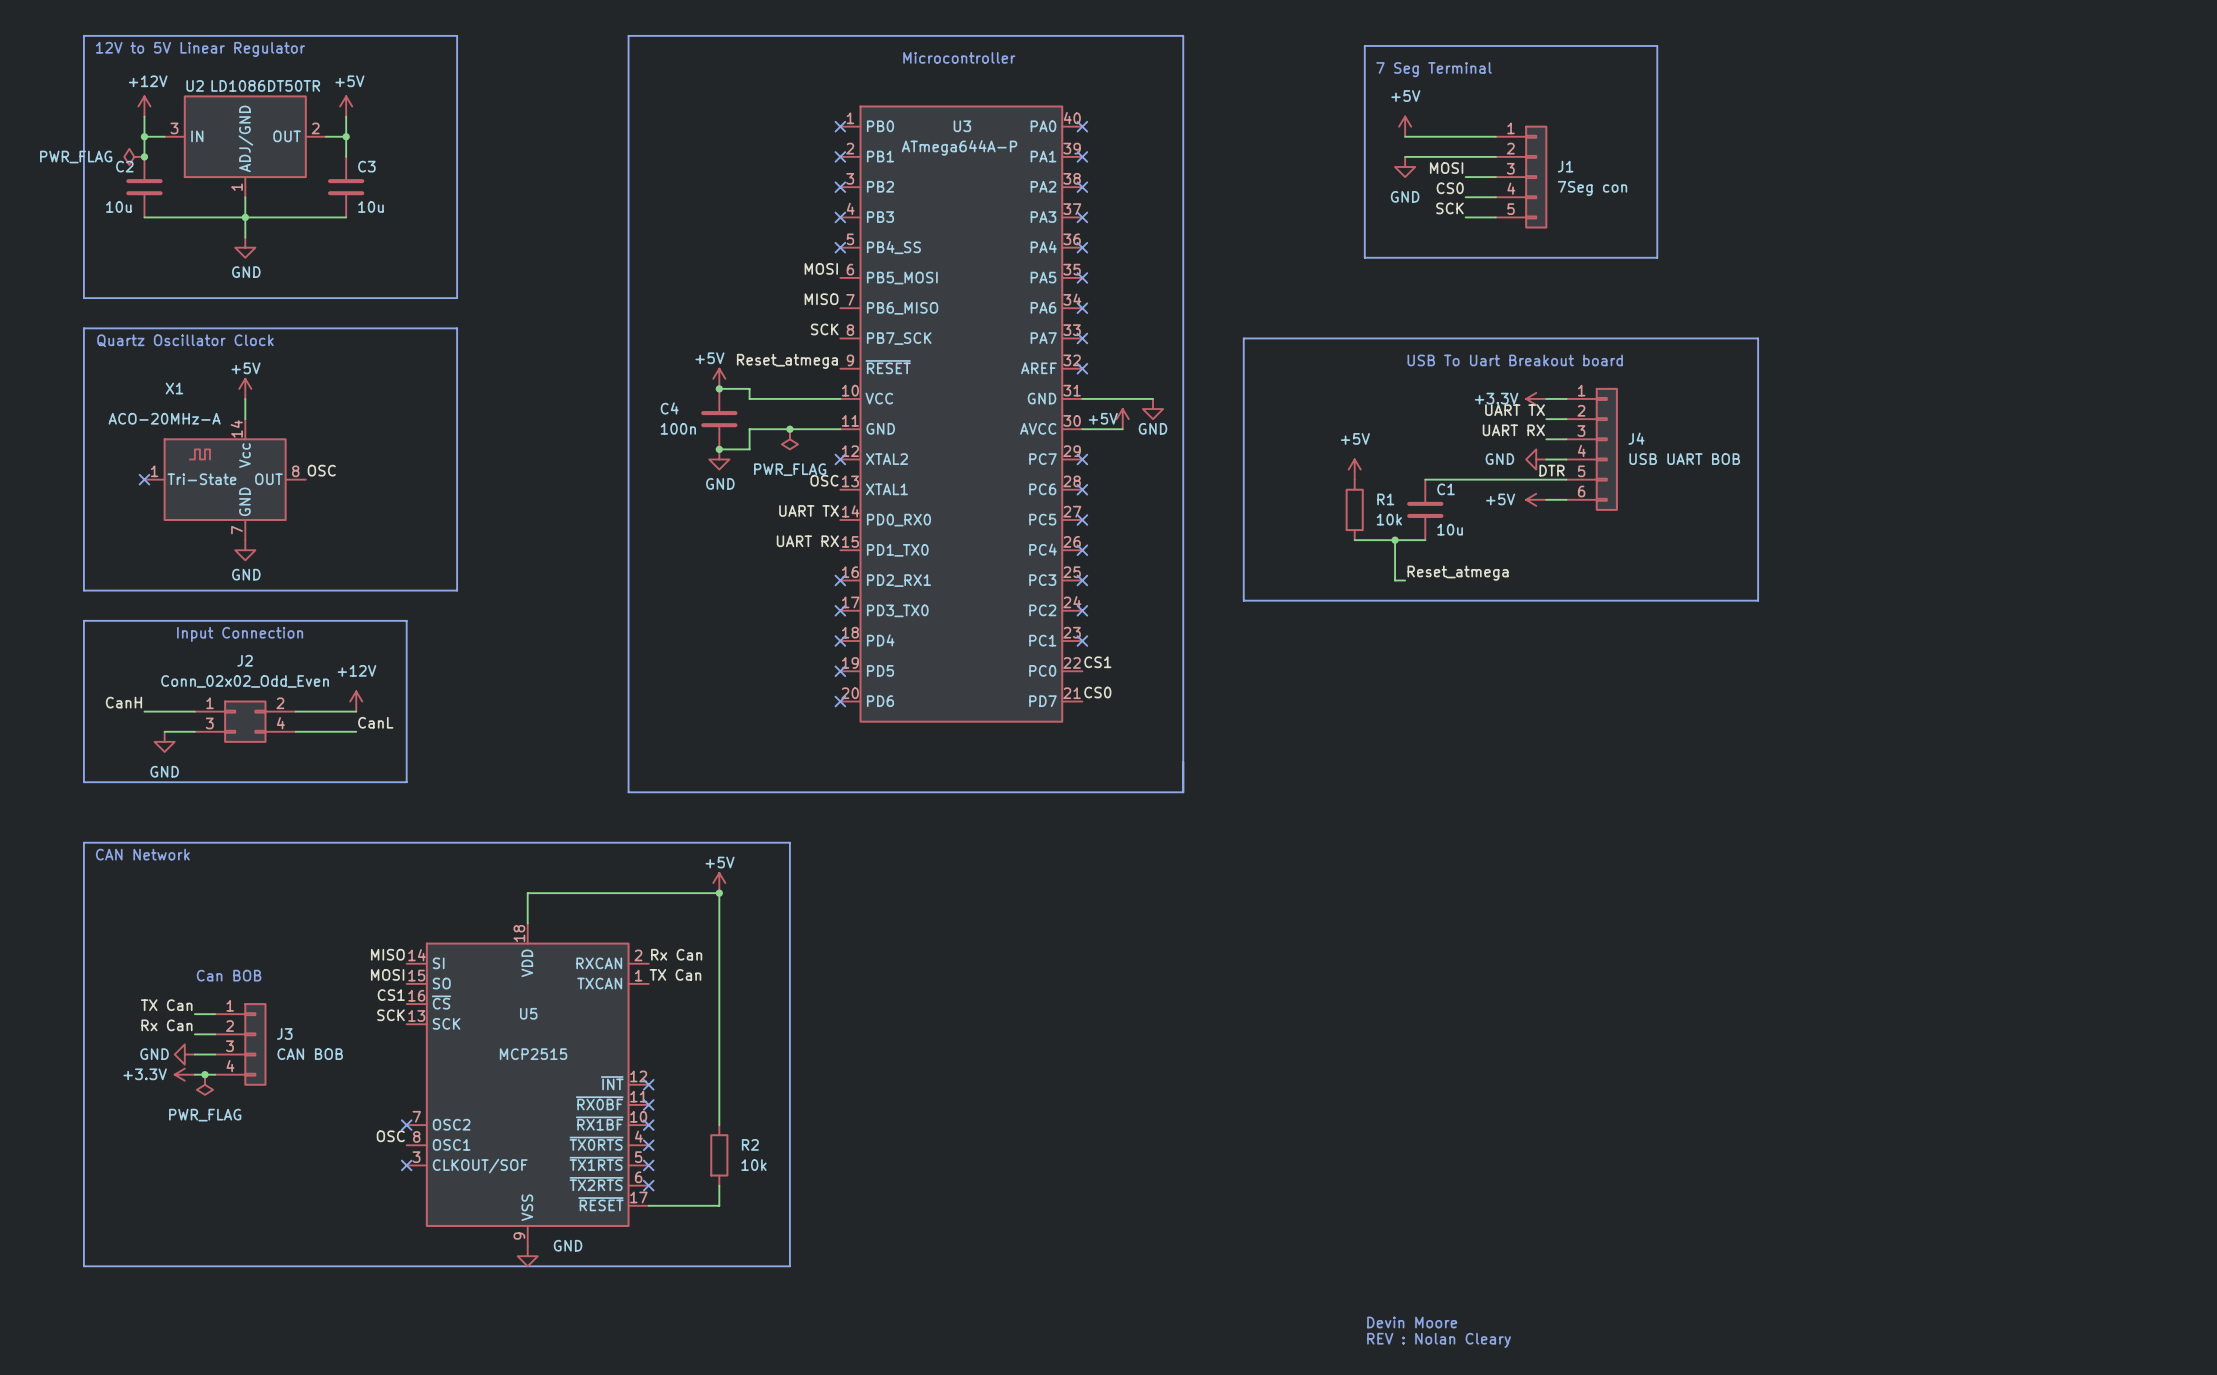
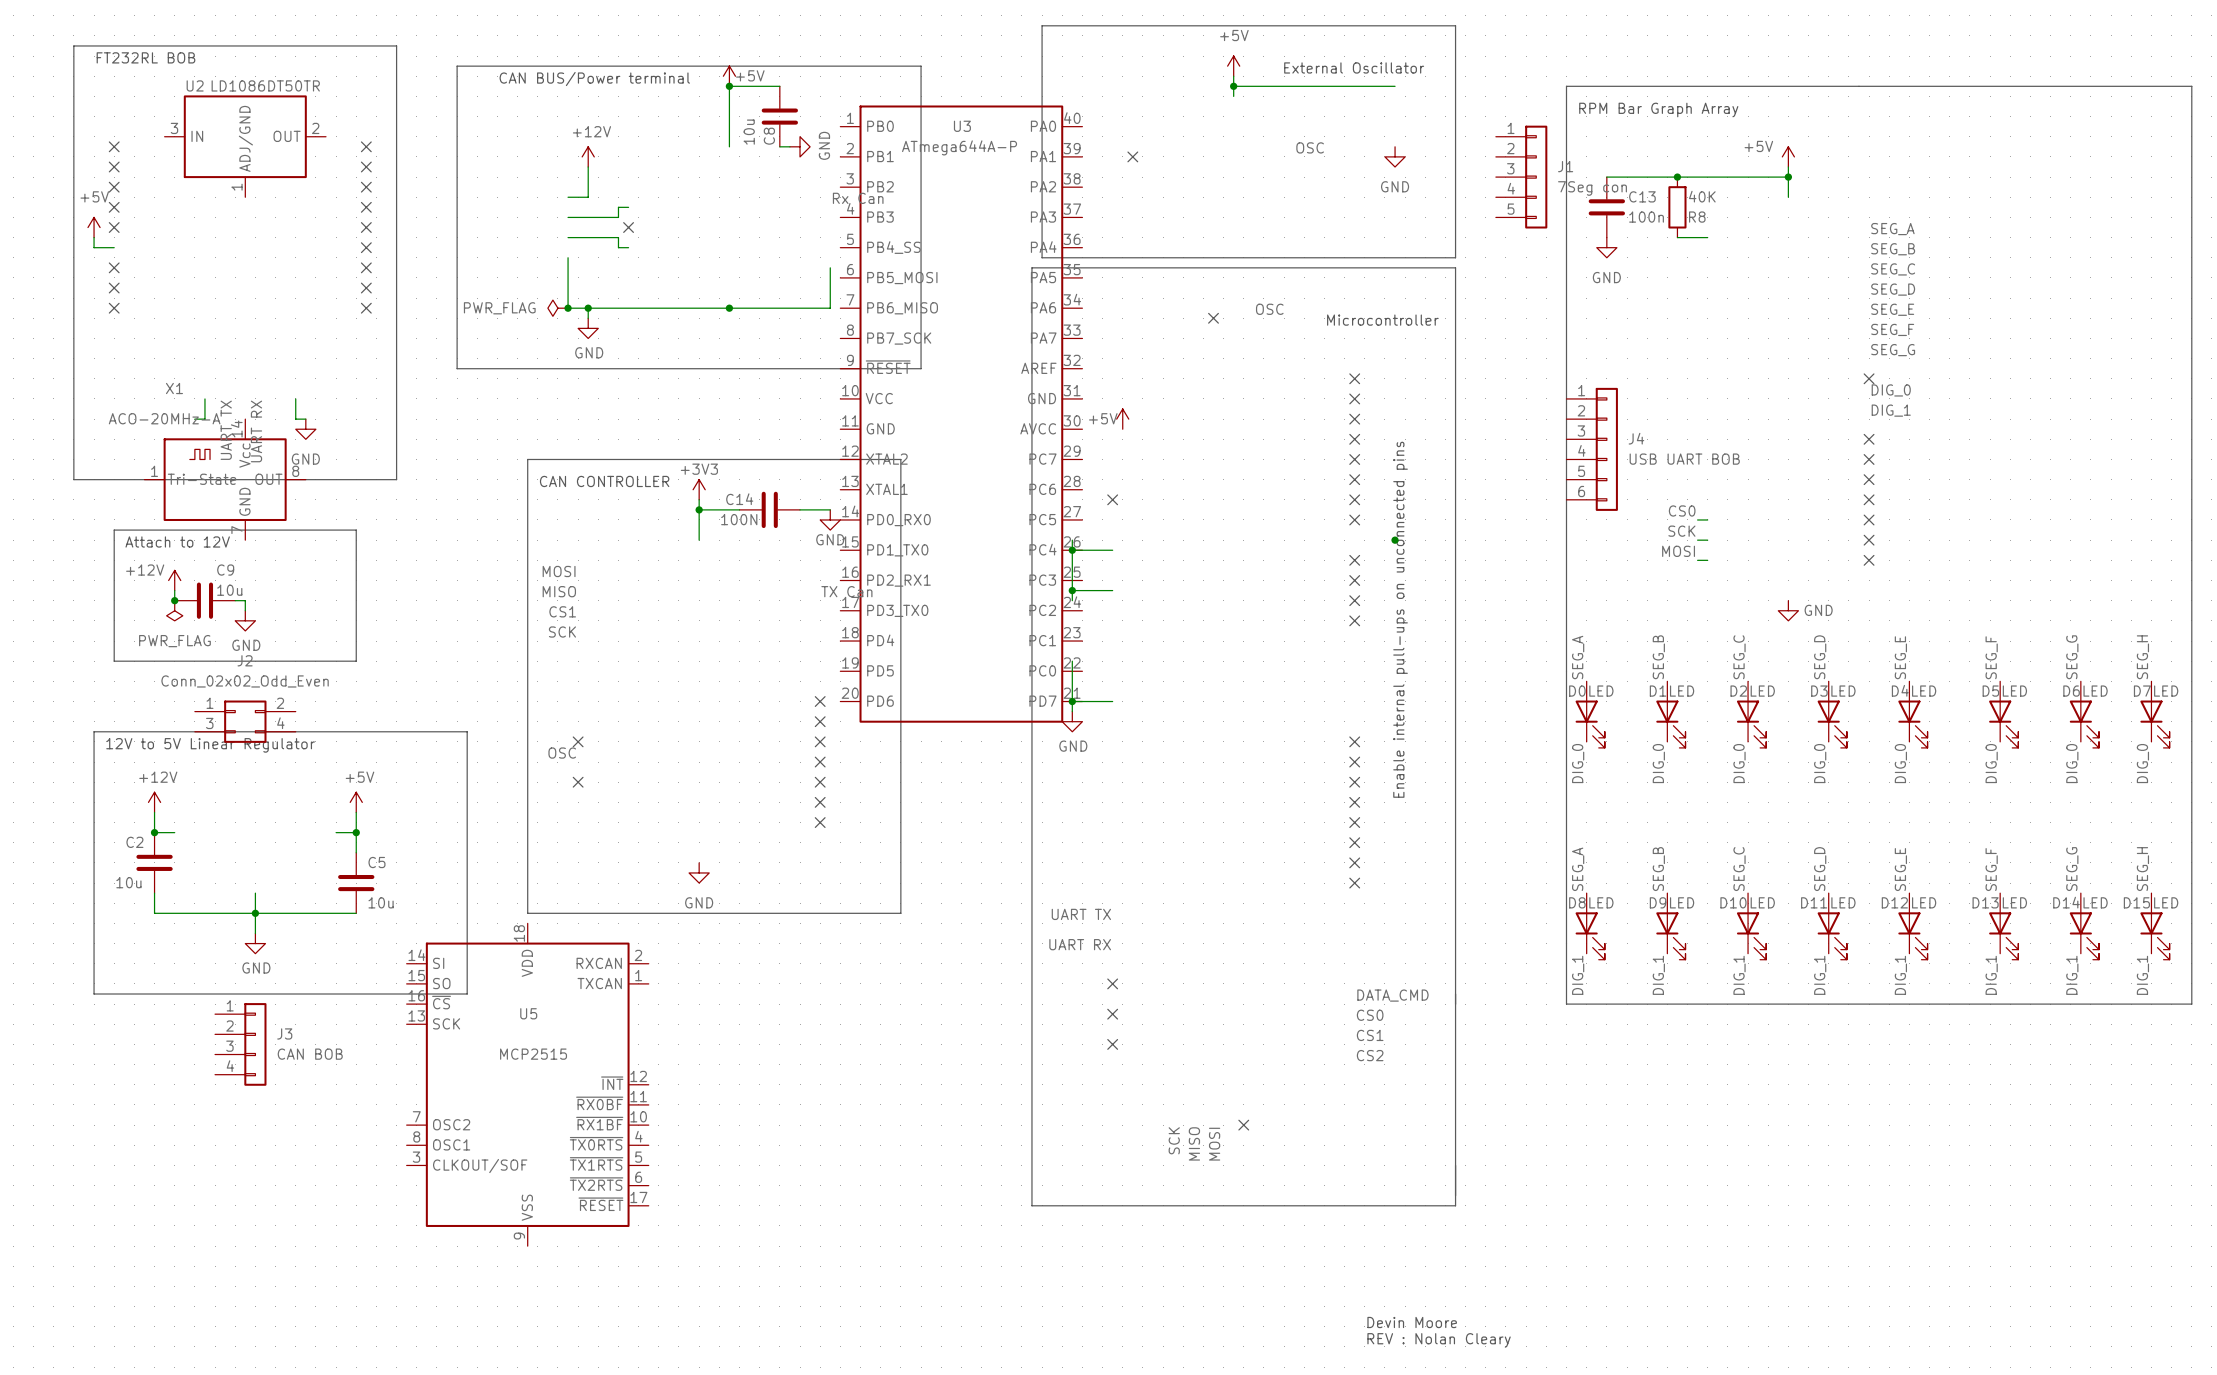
line: (628, 35) (1183, 35) (1183, 792) (628, 792) (628, 35) -> none
line: none -> (73, 45) (396, 45) (396, 479) (73, 479) (73, 45)
text: 12V to 5V Linear Regulator (200, 49) -> none
text: none -> FT232RL BOB (145, 57)
text: Microcontroller (959, 57) -> none
line: (457, 66) (457, 35) (83, 35) (83, 298) (457, 298) -> (457, 66) (921, 66) (921, 368) (457, 368)
text: none -> External Oscillator (1354, 67)
text: 7 Seg Terminal (1434, 69) -> none
power symbol: none -> +5V (729, 76)
wire: none -> (1233, 76) (1233, 96)
text: none -> CAN BUS/Power terminal (594, 79)
junction: none -> (729, 86)
wire: none -> (779, 86) (729, 86) (729, 146)
wire: none -> (1233, 86) (1395, 86)
junction: none -> (1233, 86)
line: none -> (1566, 86) (1566, 1004) (2191, 1004) (2191, 86) (1566, 86)
power symbol: +12V (144, 106) -> none
power symbol: +5V (346, 106) -> none
text: none -> RPM Bar Graph Array (1658, 109)
wire: (144, 116) (144, 156) -> none
wire: (346, 116) (346, 156) -> none
C8: none -> 10u (779, 116)
no-connect mark: (840, 126) -> none
no-connect mark: (1082, 126) -> none
power symbol position: +5V (1405, 126) -> +5V (1233, 66)
wire: (144, 136) (164, 136) -> none
junction: (144, 136) -> none
wire: (325, 136) (346, 136) -> none
junction: (346, 136) -> none
wire: (1405, 136) (1495, 136) -> none
no-connect mark: none -> (114, 146)
no-connect mark: none -> (366, 146)
wire: none -> (779, 146) (789, 146)
power symbol: none -> GND (800, 146)
label: none -> OSC (1310, 147)
power symbol: PWR_FLAG (134, 156) -> none
junction: (144, 156) -> none
power symbol: none -> +12V (588, 156)
no-connect mark: (840, 156) -> none
no-connect mark: (1082, 156) -> none
no-connect mark: none -> (1132, 156)
wire: (1405, 156) (1495, 156) -> none
power symbol: none -> +5V (1788, 156)
no-connect mark: none -> (114, 167)
no-connect mark: none -> (366, 167)
wire: none -> (588, 167) (588, 197) (568, 197)
power symbol position: GND (1405, 167) -> GND (1395, 156)
wire: none -> (1788, 167) (1788, 197)
label: MOSI (1446, 168) -> none
wire: (1465, 177) (1495, 177) -> none
wire: none -> (1606, 177) (1788, 177)
junction: none -> (1677, 177)
junction: none -> (1788, 177)
no-connect mark: none -> (114, 187)
C2 position: (144, 187) -> (154, 862)
C3: 10u (346, 187) -> none
no-connect mark: none -> (366, 187)
no-connect mark: (840, 187) -> none
no-connect mark: (1082, 187) -> none
label: CS0 (1450, 188) -> none
wire: (245, 197) (245, 237) -> none
wire: (1465, 197) (1495, 197) -> none
label: none -> Rx Can (858, 198)
no-connect mark: none -> (114, 207)
no-connect mark: none -> (366, 207)
wire: none -> (628, 207) (618, 207) (618, 217) (568, 217)
C13: none -> 100n (1606, 207)
R8: none -> 40K (1677, 207)
label: SCK (1449, 208) -> none
wire: (144, 217) (346, 217) -> none
junction: (245, 217) -> none
no-connect mark: (840, 217) -> none
no-connect mark: (1082, 217) -> none
wire: (1465, 217) (1495, 217) -> none
power symbol: none -> +5V (94, 227)
no-connect mark: none -> (114, 227)
no-connect mark: none -> (366, 227)
no-connect mark: none -> (628, 227)
label: none -> SEG_A (1892, 229)
wire: none -> (94, 237) (94, 247) (114, 247)
wire: none -> (568, 237) (618, 237) (618, 247) (628, 247)
wire: none -> (1677, 237) (1707, 237)
power symbol: GND (245, 247) -> none
no-connect mark: none -> (366, 247)
no-connect mark: (840, 247) -> none
no-connect mark: (1082, 247) -> none
power symbol: none -> GND (1606, 247)
label: none -> SEG_B (1893, 249)
wire: none -> (568, 257) (568, 308) (830, 308) (830, 267)
line: (1364, 257) (1364, 45) (1657, 45) (1657, 257) (1455, 257) -> (1364, 257) (1042, 257) (1042, 25) (1455, 25) (1455, 257)
no-connect mark: none -> (114, 267)
no-connect mark: none -> (366, 267)
line: none -> (1031, 267) (1455, 267) (1455, 1205) (1031, 1205) (1031, 267)
label: MOSI (821, 268) -> none
label: none -> SEG_C (1893, 269)
no-connect mark: (1082, 277) -> none
no-connect mark: none -> (114, 288)
no-connect mark: none -> (366, 288)
label: none -> SEG_D (1893, 289)
label: MISO (821, 299) -> none
no-connect mark: none -> (114, 308)
no-connect mark: none -> (366, 308)
power symbol: none -> PWR_FLAG (557, 308)
junction: none -> (568, 308)
wire: none -> (588, 308) (588, 318)
junction: none -> (588, 308)
junction: none -> (729, 308)
no-connect mark: (1082, 308) -> none
label: none -> OSC (1269, 309)
label: none -> SEG_E (1892, 309)
no-connect mark: none -> (1213, 318)
text: none -> Microcontroller (1382, 320)
line: (457, 328) (83, 328) (83, 590) (457, 590) (457, 368) -> (457, 328) (457, 298)
power symbol: none -> GND (588, 328)
label: SCK (824, 329) -> none
label: none -> SEG_F (1892, 329)
no-connect mark: (1082, 338) -> none
line: (1243, 338) (1758, 338) (1758, 600) (1243, 600) (1243, 338) -> none
text: Quartz Oscillator Clock (185, 340) -> none
label: none -> SEG_G (1893, 350)
text: USB To Uart Breakout board (1515, 360) -> none
label: Reset_atmega (787, 361) -> none
no-connect mark: (1082, 368) -> none
power symbol: +5V (719, 378) -> none
no-connect mark: none -> (1354, 378)
no-connect mark: none -> (1869, 378)
power symbol: +5V (245, 388) -> none
wire: (719, 388) (749, 388) (749, 398) (840, 398) -> none
junction: (719, 388) -> none
label: none -> DIG_0 (1891, 390)
wire: none -> (204, 398) (204, 419) (194, 419)
wire: (245, 398) (245, 419) -> none
wire: none -> (295, 398) (295, 419) (305, 419)
wire: (1082, 398) (1153, 398) -> none
no-connect mark: none -> (1354, 398)
power symbol: +3.3V (1536, 398) -> none
wire: (1546, 398) (1566, 398) -> none
power symbol: GND (1153, 409) -> none
label: UART TX (1515, 410) -> none
label: none -> DIG_1 (1891, 410)
C4: 100n (719, 419) -> none
no-connect mark: none -> (1354, 419)
wire: (1546, 419) (1566, 419) -> none
power symbol: none -> GND (305, 429)
junction: (789, 429) -> none
wire: (840, 429) (749, 429) (749, 449) (719, 449) -> none
wire: (1082, 429) (1122, 429) -> (1072, 550) (1112, 550)
label: none -> UART TX (226, 430)
label: UART RX (1513, 430) -> none
label: none -> UART RX (256, 431)
power symbol: PWR_FLAG (789, 439) -> none
no-connect mark: none -> (1354, 439)
wire: (1546, 439) (1566, 439) -> none
no-connect mark: none -> (1869, 439)
junction: (719, 449) -> none
line: none -> (527, 459) (900, 459) (900, 913) (527, 913) (527, 459)
power symbol: GND (719, 459) -> none
no-connect mark: (840, 459) -> none
no-connect mark: (1082, 459) -> none
no-connect mark: none -> (1354, 459)
power symbol: GND (1536, 459) -> none
wire: (1546, 459) (1566, 459) -> none
no-connect mark: none -> (1869, 459)
power symbol: +5V (1354, 469) -> none
label: OSC (321, 470) -> none
label: DTR (1552, 470) -> none
no-connect mark: (144, 479) -> none
no-connect mark: none -> (1354, 479)
wire: (1425, 479) (1566, 479) -> none
no-connect mark: none -> (1869, 479)
label: OSC (824, 480) -> none
text: none -> CAN CONTROLLER (604, 481)
power symbol: none -> +3V3 (699, 489)
no-connect mark: (1082, 489) -> none
wire: none -> (699, 499) (699, 540)
no-connect mark: none -> (1112, 499)
no-connect mark: none -> (1354, 499)
power symbol: +5V (1536, 499) -> none
wire: (1546, 499) (1566, 499) -> none
no-connect mark: none -> (1869, 499)
wire: none -> (699, 509) (739, 509)
junction: none -> (699, 509)
C14: none -> 100N (769, 509)
wire: none -> (800, 509) (830, 509)
R1: 10k (1354, 509) -> none
C1: 10u (1425, 509) -> none
label: UART TX (809, 510) -> none
label: none -> CS0 (1682, 510)
power symbol: none -> GND (830, 519)
no-connect mark: (1082, 519) -> none
no-connect mark: none -> (1354, 519)
wire: none -> (1697, 519) (1707, 519)
no-connect mark: none -> (1869, 519)
line: none -> (114, 530) (114, 661) (356, 661) (356, 530) (114, 530)
label: none -> SCK (1681, 531)
wire: none -> (1072, 540) (1072, 600)
wire: (1354, 540) (1425, 540) -> none
wire: (1395, 540) (1395, 580) (1405, 580) -> none
wire: none -> (1697, 540) (1707, 540)
no-connect mark: none -> (1869, 540)
text: none -> Attach to 12V (177, 541)
label: UART RX (807, 541) -> none
power symbol: GND (245, 550) -> none
junction: none -> (1072, 550)
no-connect mark: (1082, 550) -> none
label: none -> MOSI (1678, 551)
no-connect mark: none -> (1354, 560)
wire: none -> (1697, 560) (1707, 560)
no-connect mark: none -> (1869, 560)
label: none -> MOSI (559, 571)
label: Reset_atmega (1458, 573) -> none
power symbol: none -> +12V (174, 580)
no-connect mark: (840, 580) -> none
no-connect mark: (1082, 580) -> none
no-connect mark: none -> (1354, 580)
wire: none -> (174, 590) (174, 600)
wire: none -> (1072, 590) (1112, 590)
junction: none -> (1072, 590)
label: none -> MISO (559, 591)
label: none -> TX Can (846, 591)
junction: none -> (174, 600)
C9: none -> 10u (204, 600)
wire: none -> (235, 600) (245, 600) (245, 610)
no-connect mark: none -> (1354, 600)
power symbol: none -> PWR_FLAG (174, 610)
no-connect mark: (840, 610) -> none
no-connect mark: (1082, 610) -> none
power symbol: none -> GND (1788, 610)
label: none -> CS1 (562, 611)
text: none -> Enable internal pull-ups on unconnected pins (1400, 619)
line: (83, 620) (406, 620) (406, 782) (83, 782) (83, 620) -> none
power symbol: none -> GND (245, 620)
no-connect mark: none -> (1354, 620)
label: none -> SCK (562, 632)
text: Input Connection (240, 634) -> none
no-connect mark: (840, 641) -> none
no-connect mark: (1082, 641) -> none
label: none -> SEG_A (1578, 657)
label: none -> SEG_B (1658, 657)
label: none -> SEG_C (1739, 657)
label: none -> SEG_D (1820, 657)
label: none -> SEG_E (1900, 657)
label: none -> SEG_F (1991, 657)
label: none -> SEG_G (2072, 657)
label: none -> SEG_H (2142, 657)
wire: none -> (1072, 661) (1072, 711)
label: CS1 (1097, 662) -> none
no-connect mark: (840, 671) -> none
label: CS0 (1097, 692) -> none
power symbol: +12V (356, 701) -> none
no-connect mark: none -> (820, 701)
no-connect mark: (840, 701) -> none
wire: none -> (1072, 701) (1112, 701)
junction: none -> (1072, 701)
label: CanH (123, 702) -> none
wire: (144, 711) (194, 711) -> none
wire: (295, 711) (356, 711) -> none
D0: none -> LED (1590, 714)
D1: none -> LED (1670, 714)
D2: none -> LED (1751, 714)
D3: none -> LED (1832, 714)
D4: none -> LED (1912, 714)
D5: none -> LED (2003, 714)
D6: none -> LED (2084, 714)
D7: none -> LED (2154, 714)
no-connect mark: none -> (820, 721)
power symbol: none -> GND (1072, 721)
label: CanL (375, 722) -> none
line: none -> (94, 731) (94, 994) (467, 994) (467, 731) (94, 731)
power symbol: GND (164, 741) -> none
no-connect mark: none -> (578, 741)
no-connect mark: none -> (820, 741)
no-connect mark: none -> (1354, 741)
text: none -> 12V to 5V Linear Regulator (210, 745)
label: none -> OSC (562, 753)
no-connect mark: none -> (820, 762)
no-connect mark: none -> (1354, 762)
label: none -> DIG_0 (1578, 763)
label: none -> DIG_0 (1658, 763)
label: none -> DIG_0 (1739, 763)
label: none -> DIG_0 (1820, 763)
label: none -> DIG_0 (1900, 763)
label: none -> DIG_0 (1991, 763)
label: none -> DIG_0 (2072, 763)
label: none -> DIG_0 (2142, 763)
no-connect mark: none -> (578, 782)
no-connect mark: none -> (820, 782)
no-connect mark: none -> (1354, 782)
power symbol: none -> +12V (154, 802)
power symbol: none -> +5V (356, 802)
no-connect mark: none -> (820, 802)
no-connect mark: none -> (1354, 802)
wire: none -> (154, 812) (154, 832) (174, 832)
wire: none -> (356, 812) (356, 852)
no-connect mark: none -> (820, 822)
no-connect mark: none -> (1354, 822)
junction: none -> (154, 832)
wire: none -> (336, 832) (356, 832)
junction: none -> (356, 832)
line: (83, 842) (83, 1266) (789, 1266) (789, 842) (83, 842) -> none
no-connect mark: none -> (1354, 842)
text: CAN Network (142, 854) -> none
no-connect mark: none -> (1354, 862)
label: none -> SEG_A (1578, 869)
label: none -> SEG_B (1658, 869)
label: none -> SEG_C (1739, 869)
label: none -> SEG_D (1820, 869)
label: none -> SEG_E (1900, 869)
label: none -> SEG_F (1991, 869)
label: none -> SEG_G (2072, 869)
label: none -> SEG_H (2142, 869)
power symbol: none -> GND (699, 872)
C5: none -> 10u (356, 883)
power symbol: +5V (719, 883) -> none
no-connect mark: none -> (1354, 883)
wire: none -> (154, 893) (154, 913) (356, 913)
wire: none -> (255, 893) (255, 933)
junction: (719, 893) -> none
junction: none -> (255, 913)
label: none -> UART TX (1081, 914)
wire: (527, 923) (527, 893) (719, 893) (719, 1125) -> none
D8: none -> LED (1590, 926)
D9: none -> LED (1670, 926)
D10: none -> LED (1751, 926)
D11: none -> LED (1832, 926)
D12: none -> LED (1912, 926)
D13: none -> LED (2003, 926)
D14: none -> LED (2084, 926)
D15: none -> LED (2154, 926)
power symbol: none -> GND (255, 943)
label: none -> UART RX (1080, 944)
label: MISO (387, 954) -> none
label: Rx Can (676, 954) -> none
label: MOSI (387, 974) -> none
label: TX Can (675, 974) -> none
text: Can BOB (229, 975) -> none
label: none -> DIG_1 (1578, 975)
label: none -> DIG_1 (1658, 975)
label: none -> DIG_1 (1739, 975)
label: none -> DIG_1 (1820, 975)
label: none -> DIG_1 (1900, 975)
label: none -> DIG_1 (1991, 975)
label: none -> DIG_1 (2072, 975)
label: none -> DIG_1 (2142, 975)
no-connect mark: none -> (1112, 983)
label: CS1 (391, 995) -> none
label: none -> DATA_CMD (1392, 995)
label: TX Can (166, 1005) -> none
wire: (194, 1014) (215, 1014) -> none
no-connect mark: none -> (1112, 1014)
label: SCK (390, 1015) -> none
label: none -> CS0 (1370, 1015)
label: Rx Can (166, 1025) -> none
wire: (194, 1034) (215, 1034) -> none
label: none -> CS1 (1370, 1035)
no-connect mark: none -> (1112, 1044)
power symbol: GND (184, 1054) -> none
wire: (194, 1054) (215, 1054) -> none
label: none -> CS2 (1370, 1055)
power symbol: +3.3V (184, 1074) -> none
wire: (194, 1074) (215, 1074) -> none
junction: (204, 1074) -> none
power symbol: PWR_FLAG (204, 1084) -> none
no-connect mark: (648, 1084) -> none
no-connect mark: (648, 1104) -> none
no-connect mark: (406, 1125) -> none
no-connect mark: (648, 1125) -> none
no-connect mark: none -> (1243, 1125)
label: OSC (390, 1136) -> none
label: none -> SCK (1174, 1140)
label: none -> MISO (1194, 1143)
label: none -> MOSI (1214, 1144)
no-connect mark: (648, 1145) -> none
R2: 10k (719, 1155) -> none
no-connect mark: (406, 1165) -> none
no-connect mark: (648, 1165) -> none
no-connect mark: (648, 1185) -> none
wire: (719, 1185) (719, 1205) (648, 1205) -> none
power symbol: GND (527, 1256) -> none

